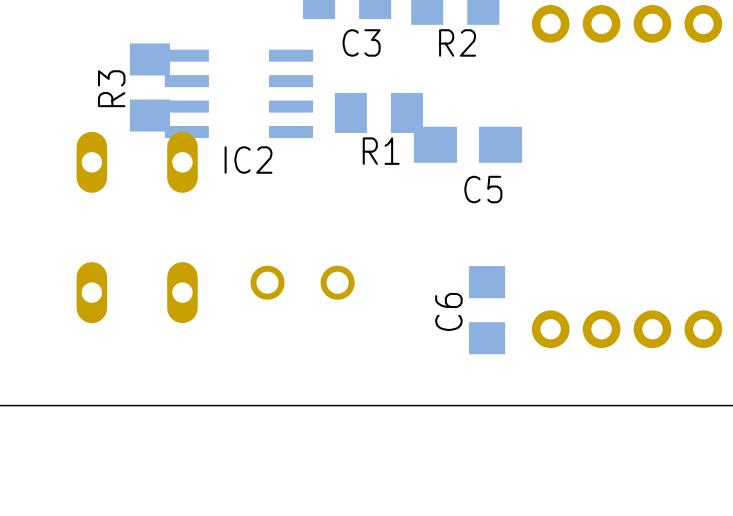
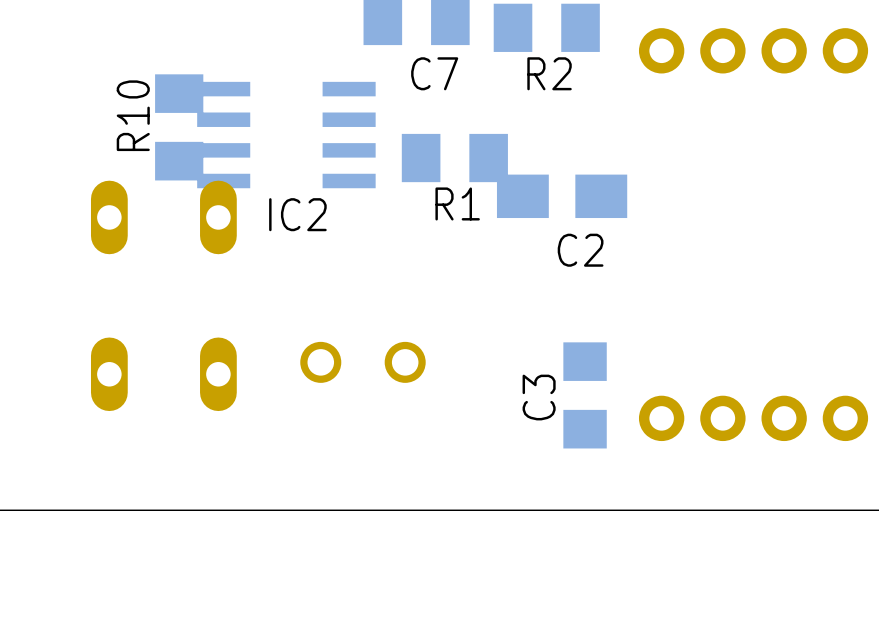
C3 name: C3 (361, 42) -> C7 (434, 73)
R3 name: R3 (111, 88) -> R10 (133, 115)
C5 name: C5 (483, 189) -> C2 (580, 250)
C6 name: C6 (448, 311) -> C3 (539, 397)

